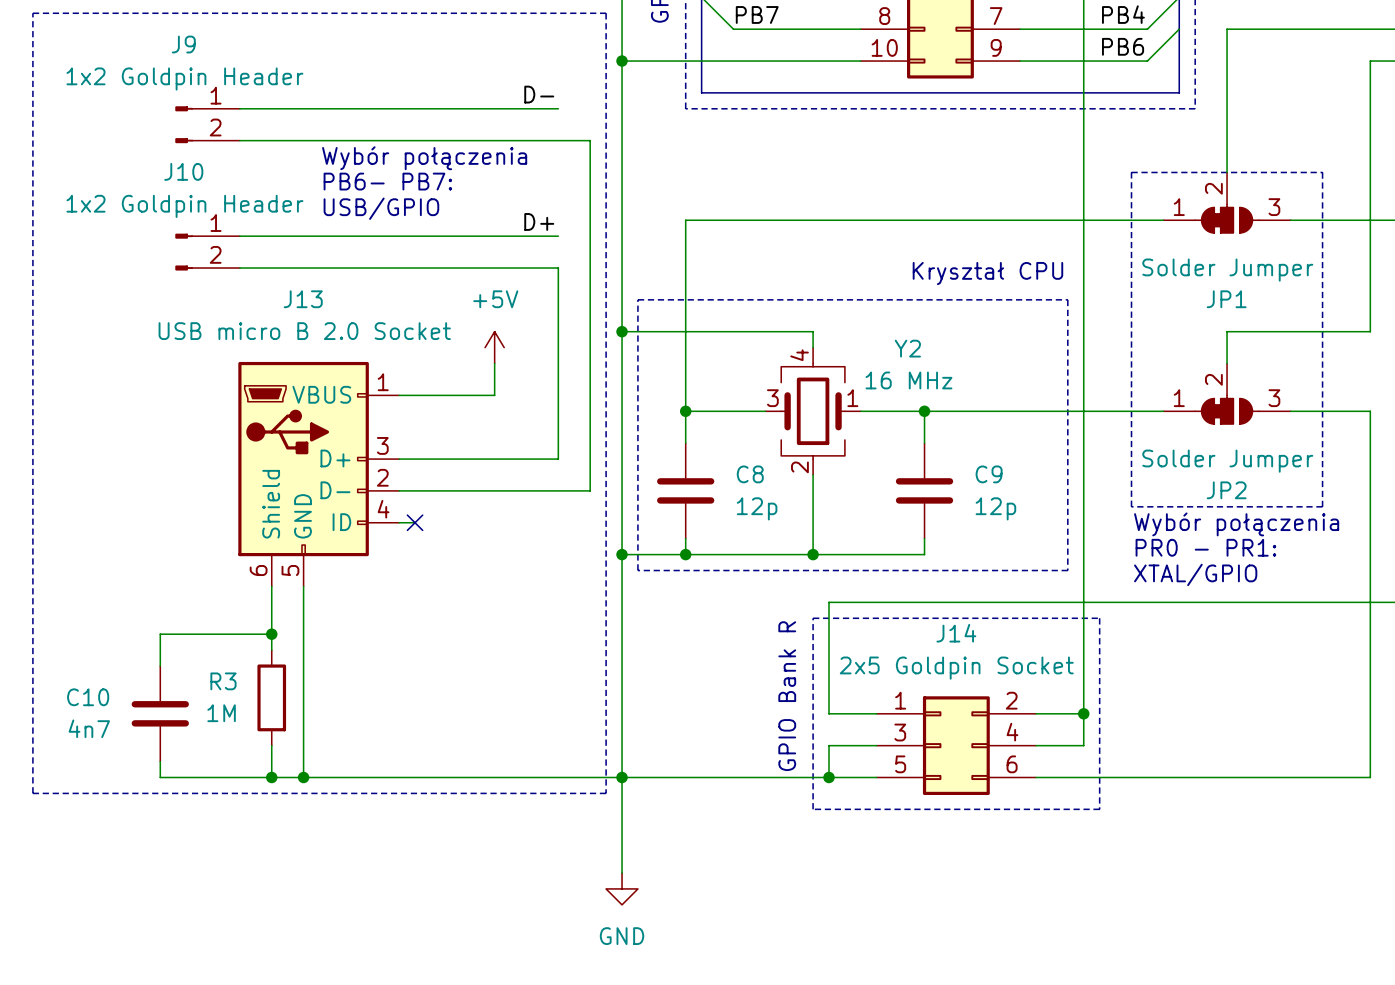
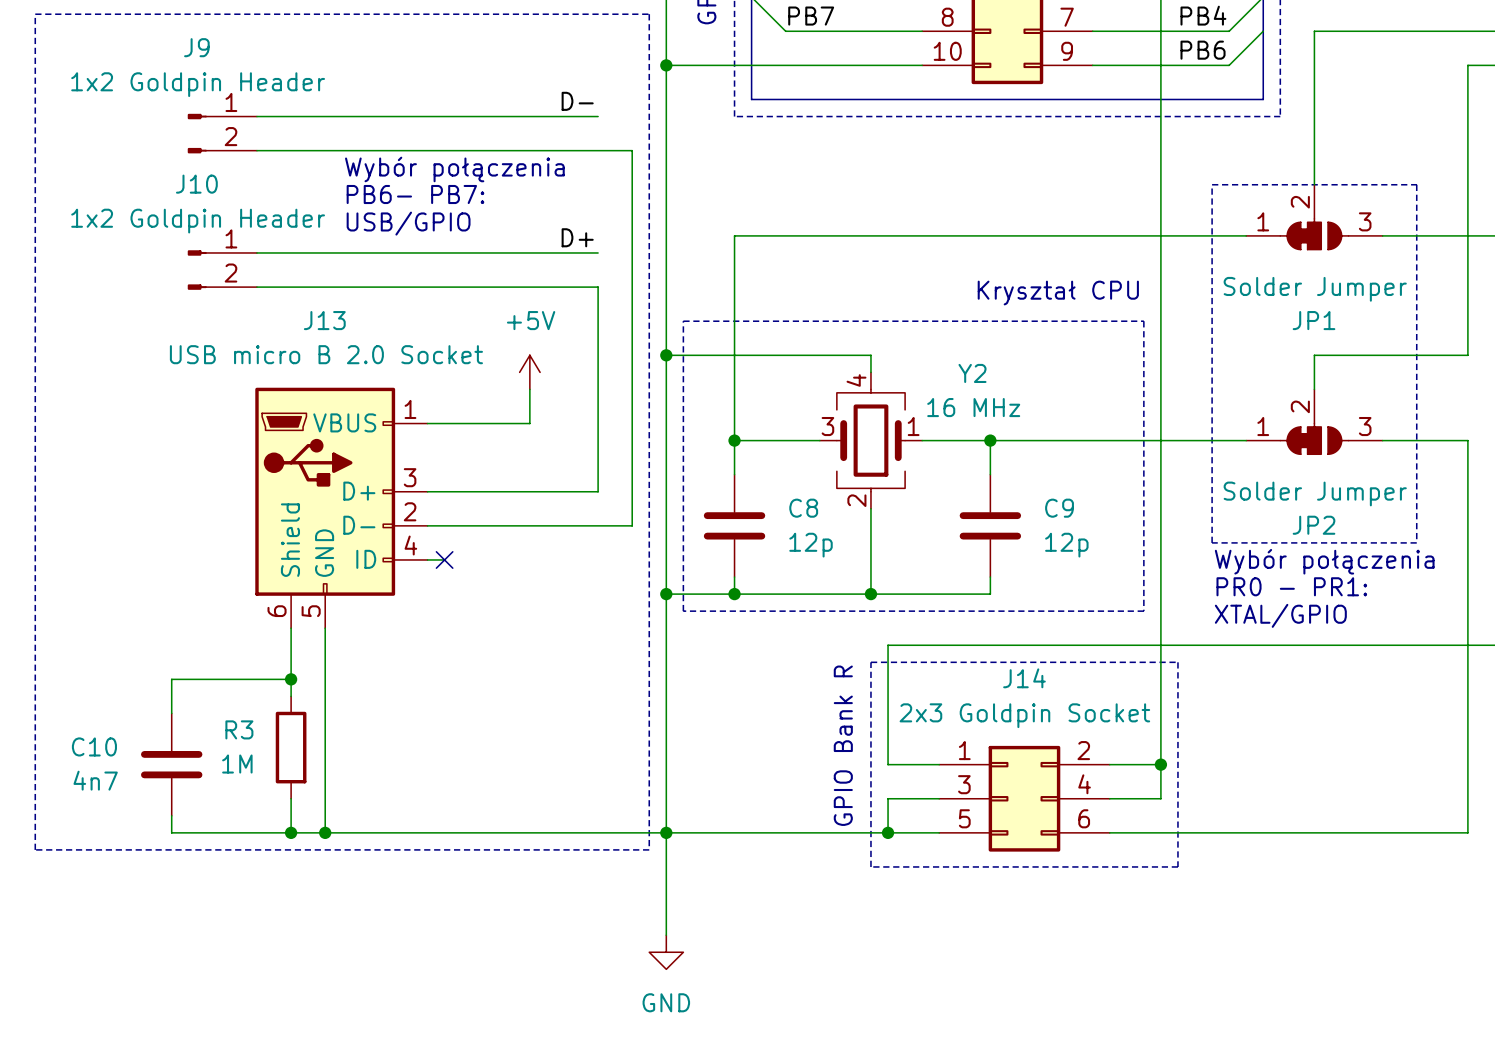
J14 value: 2x5 Goldpin Socket (956, 668) -> 2x3 Goldpin Socket (1024, 715)

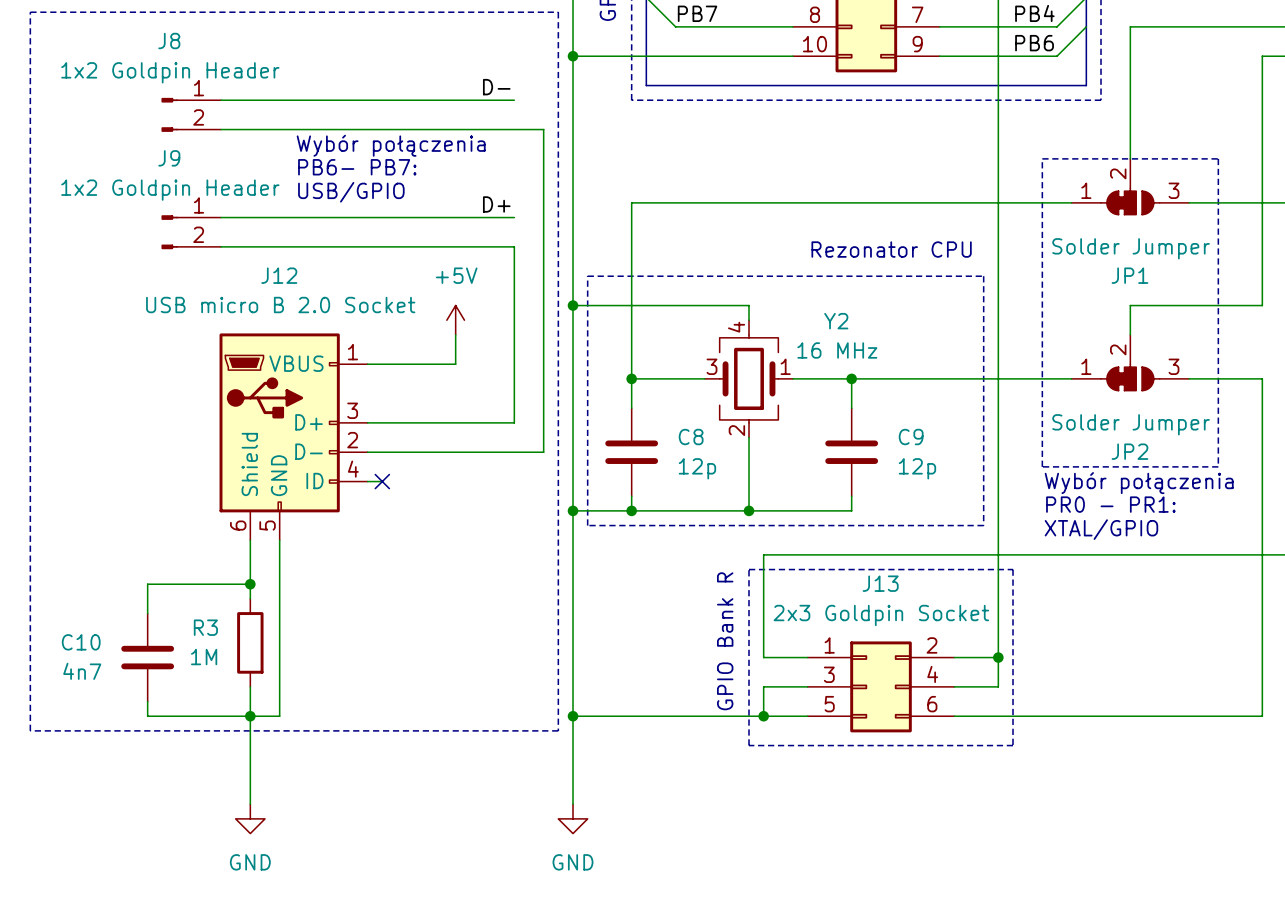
J9 name: J9 (196, 47) -> J8 (169, 41)
J10 name: J10 (196, 184) -> J9 (169, 158)
text: none -> Rezonator CPU (891, 249)
text: Kryształ CPU (1058, 293) -> none
J13 name: J13 (324, 320) -> J12 (279, 275)
J14 name: J14 (1024, 678) -> J13 (880, 583)
wire: none -> (250, 716) (250, 804)
wire: (325, 832) (666, 832) -> none
junction: (325, 832) -> none
power symbol: none -> GND (250, 818)

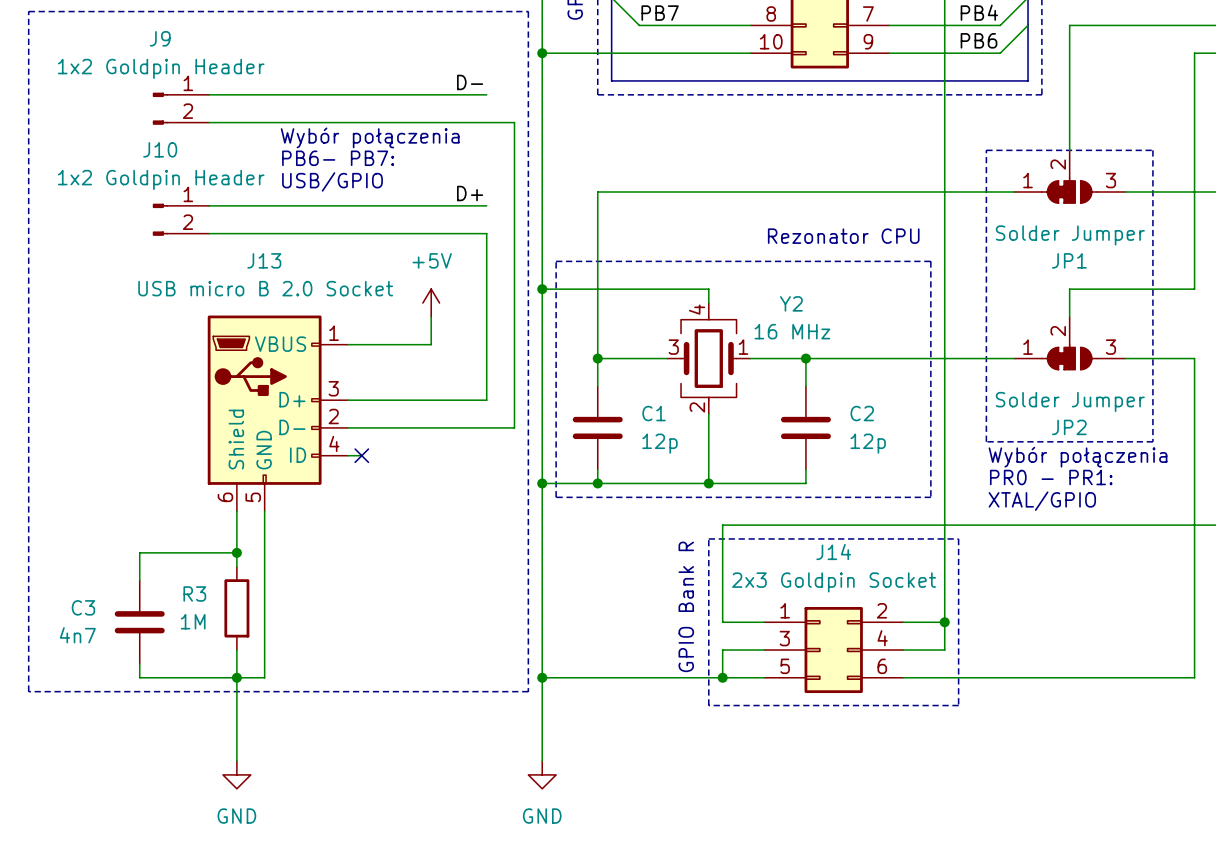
J8 name: J8 (169, 41) -> J9 (160, 38)
J9 name: J9 (169, 158) -> J10 (160, 149)
J12 name: J12 (279, 275) -> J13 (264, 260)
C8 name: C8 (691, 437) -> C1 (654, 413)
C9 name: C9 (911, 437) -> C2 (862, 413)
J13 name: J13 (880, 583) -> J14 (833, 552)
C10 name: C10 (81, 642) -> C3 (83, 607)

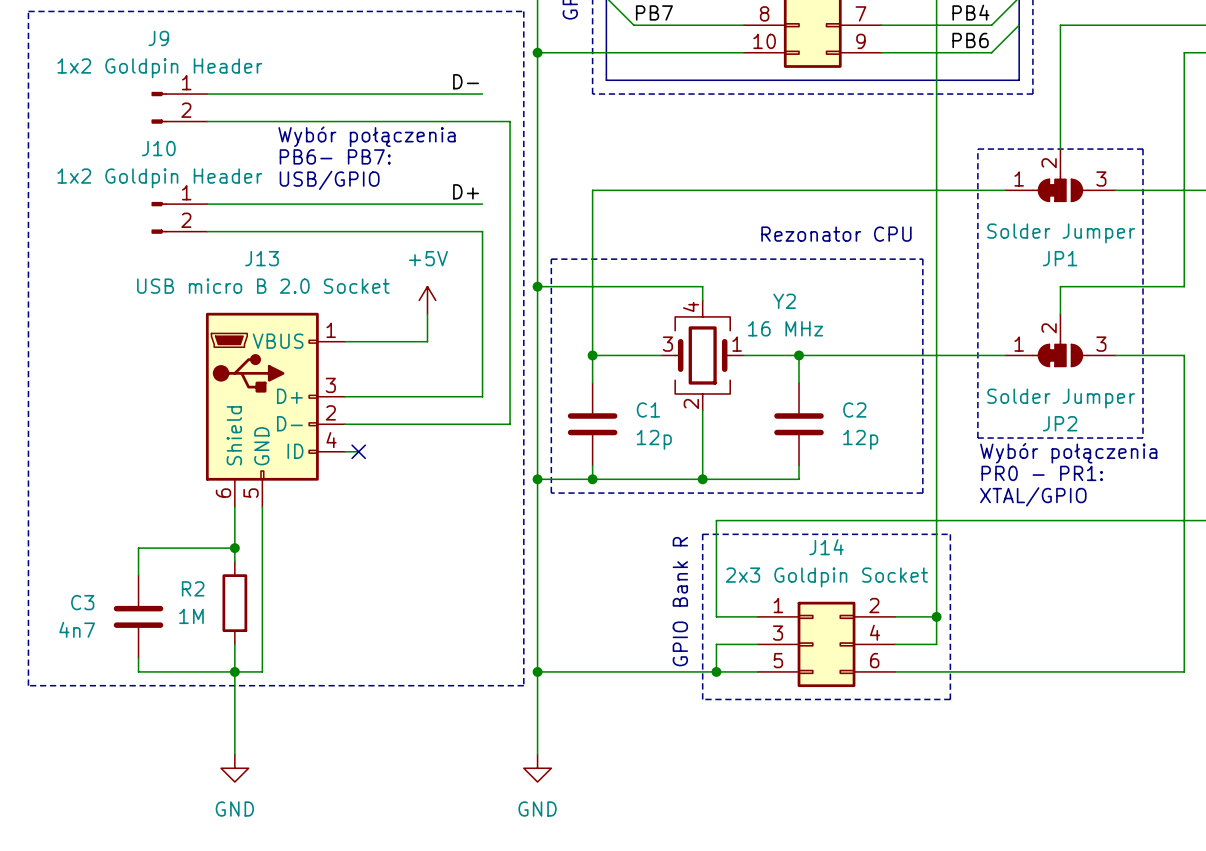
R3 name: R3 (194, 593) -> R2 (193, 588)

